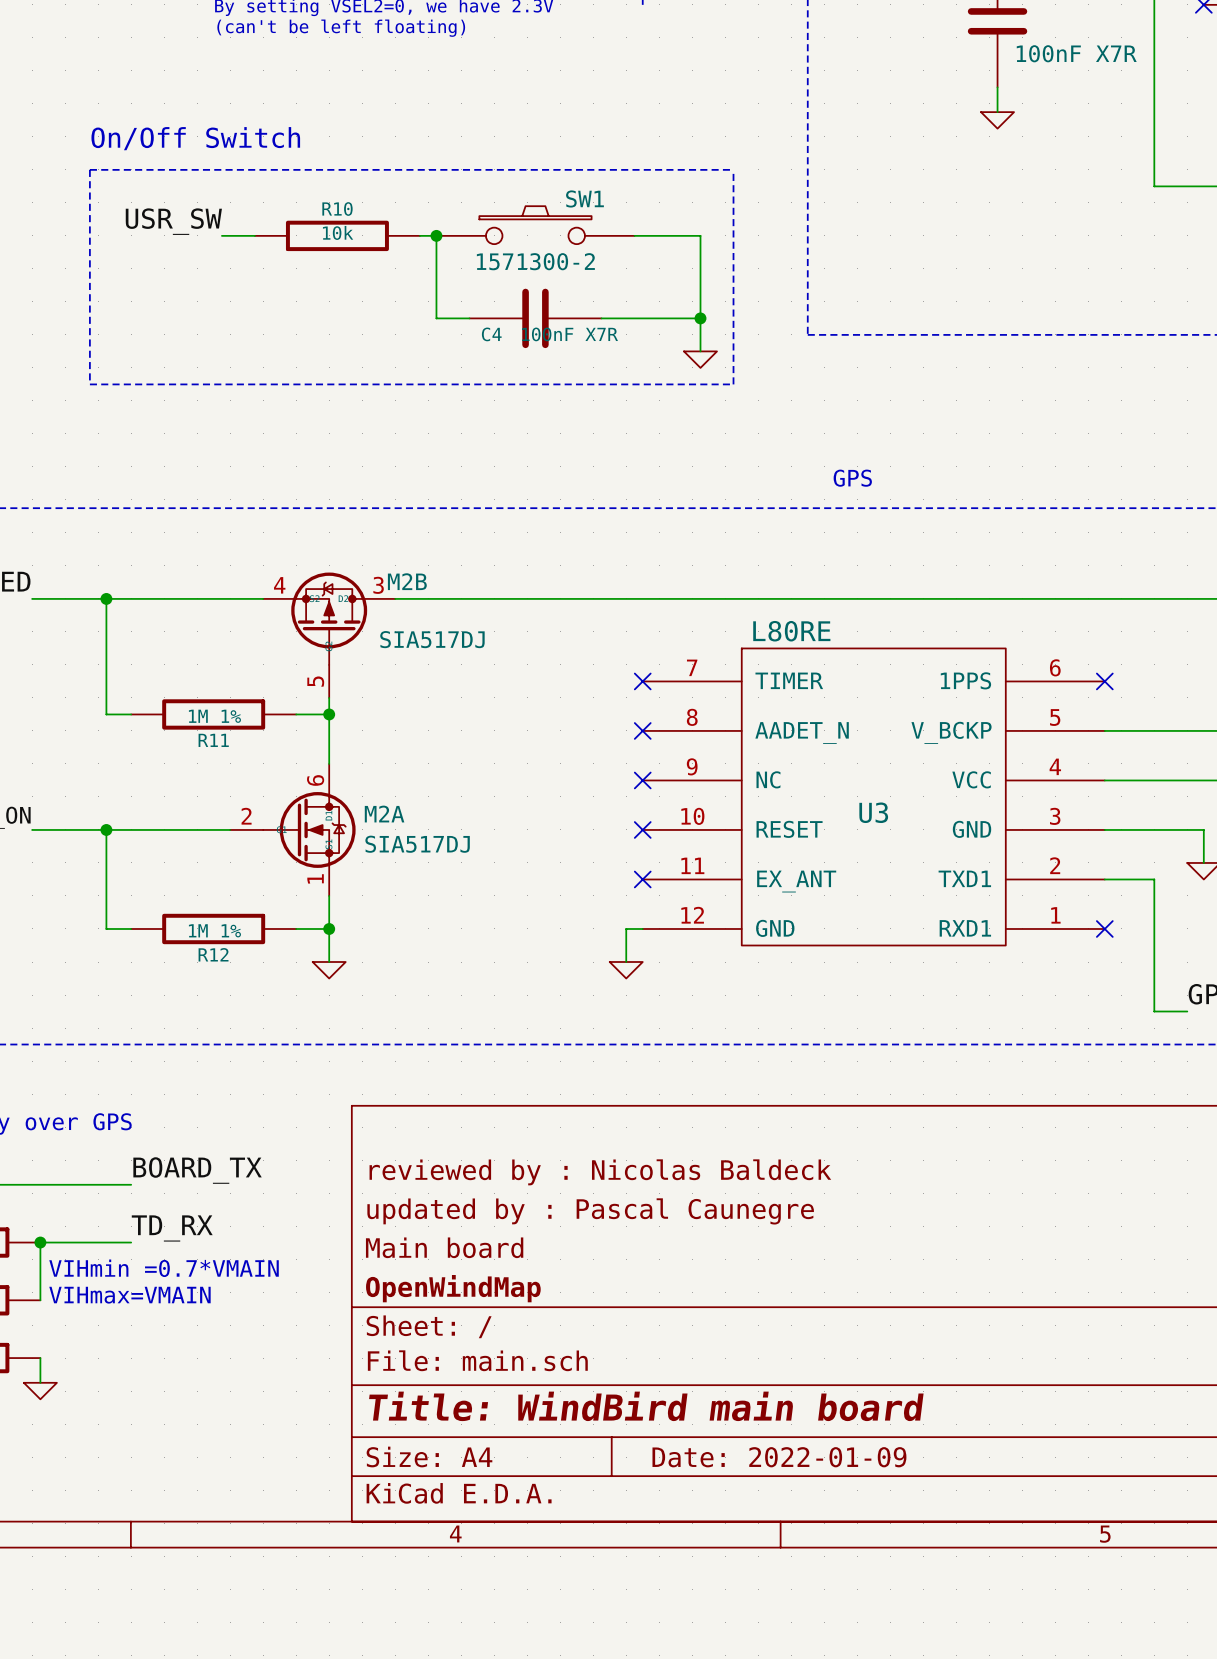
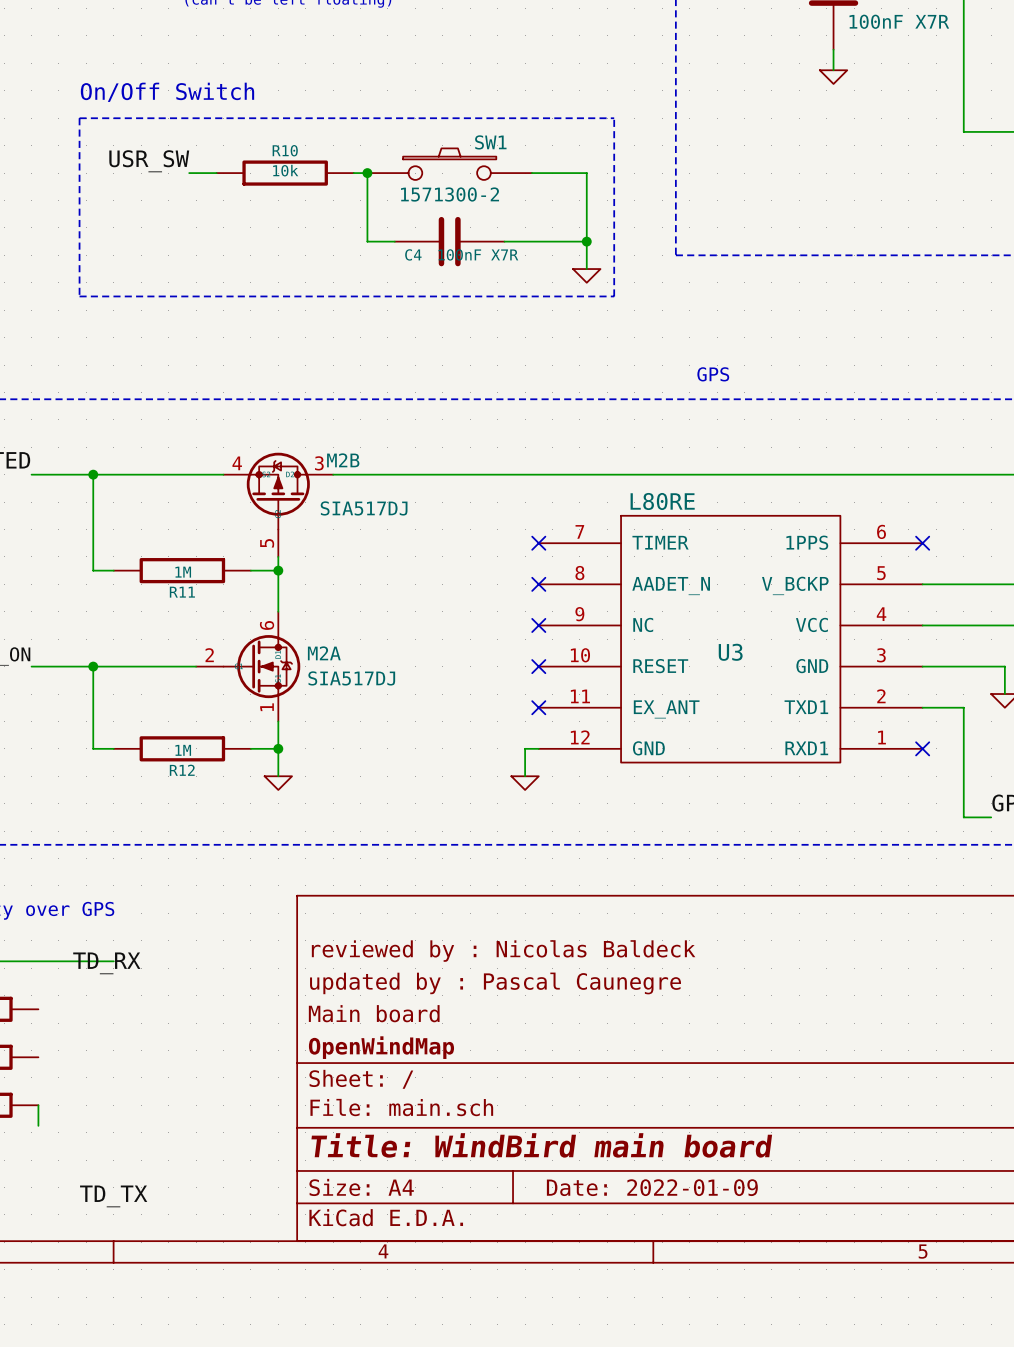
R11 value: 1M 1% (214, 716) -> 1M (183, 572)
R12 value: 1M 1% (214, 930) -> 1M (183, 750)
label: BOARD_TX (197, 1170) -> none
label position: TD_RX (172, 1228) -> TD_RX (106, 963)
junction: (40, 1242) -> none
wire: (131, 1242) (40, 1242) (40, 1300) -> none
text: VIHmin =0.7*VMAIN (164, 1268) -> none
text: VIHmax=VMAIN (129, 1295) -> none
power symbol: (40, 1391) -> none
label: none -> TD_TX (113, 1196)

